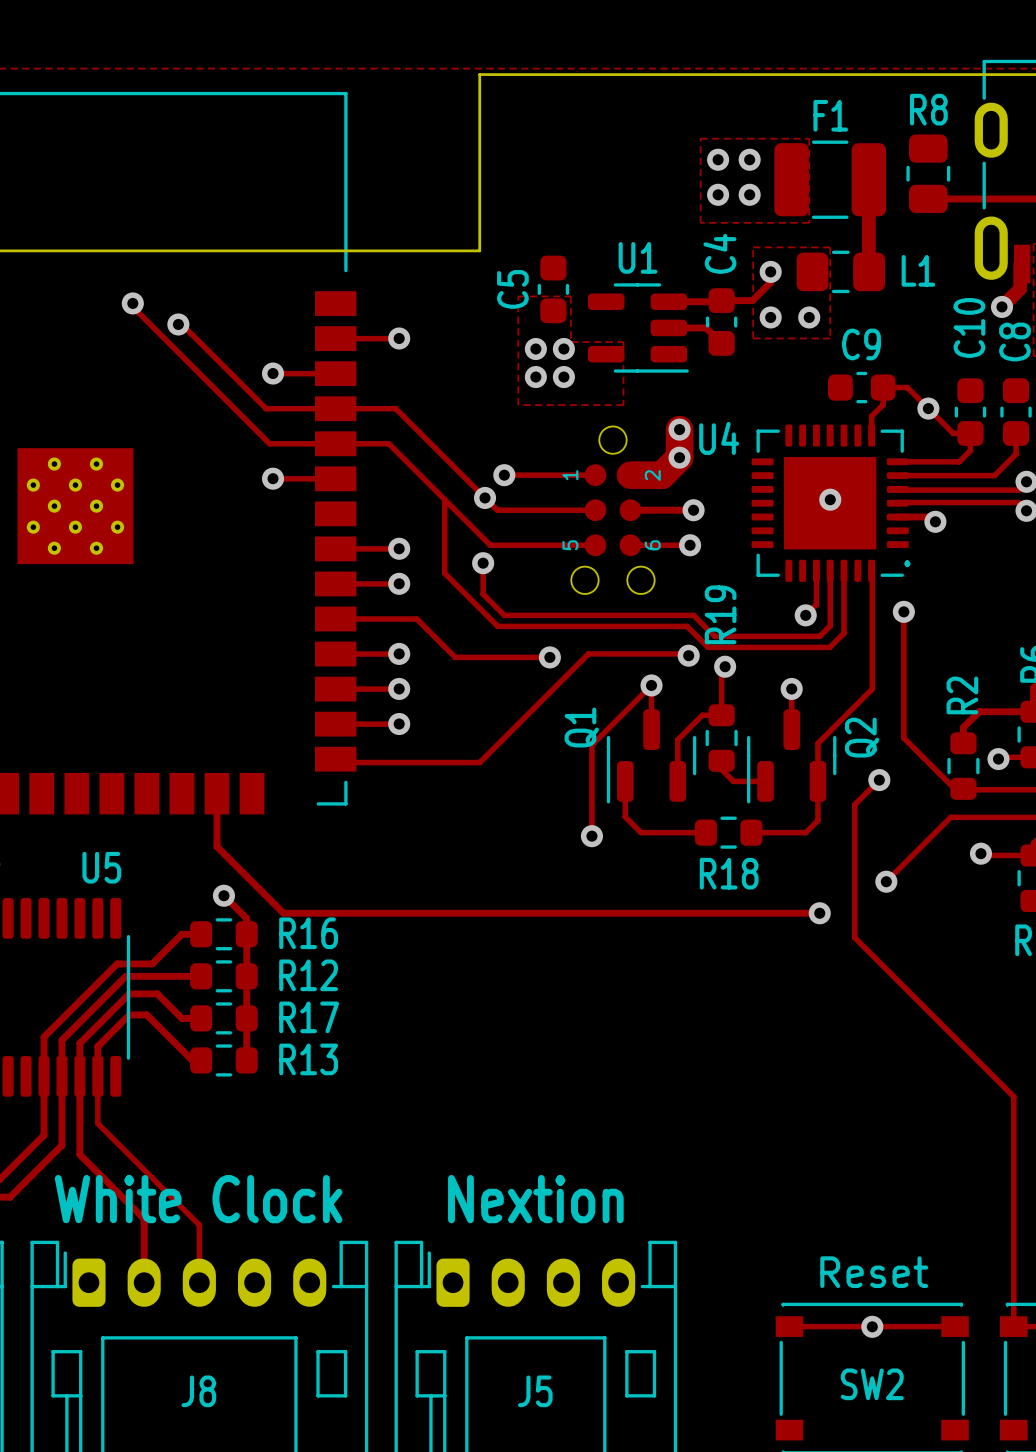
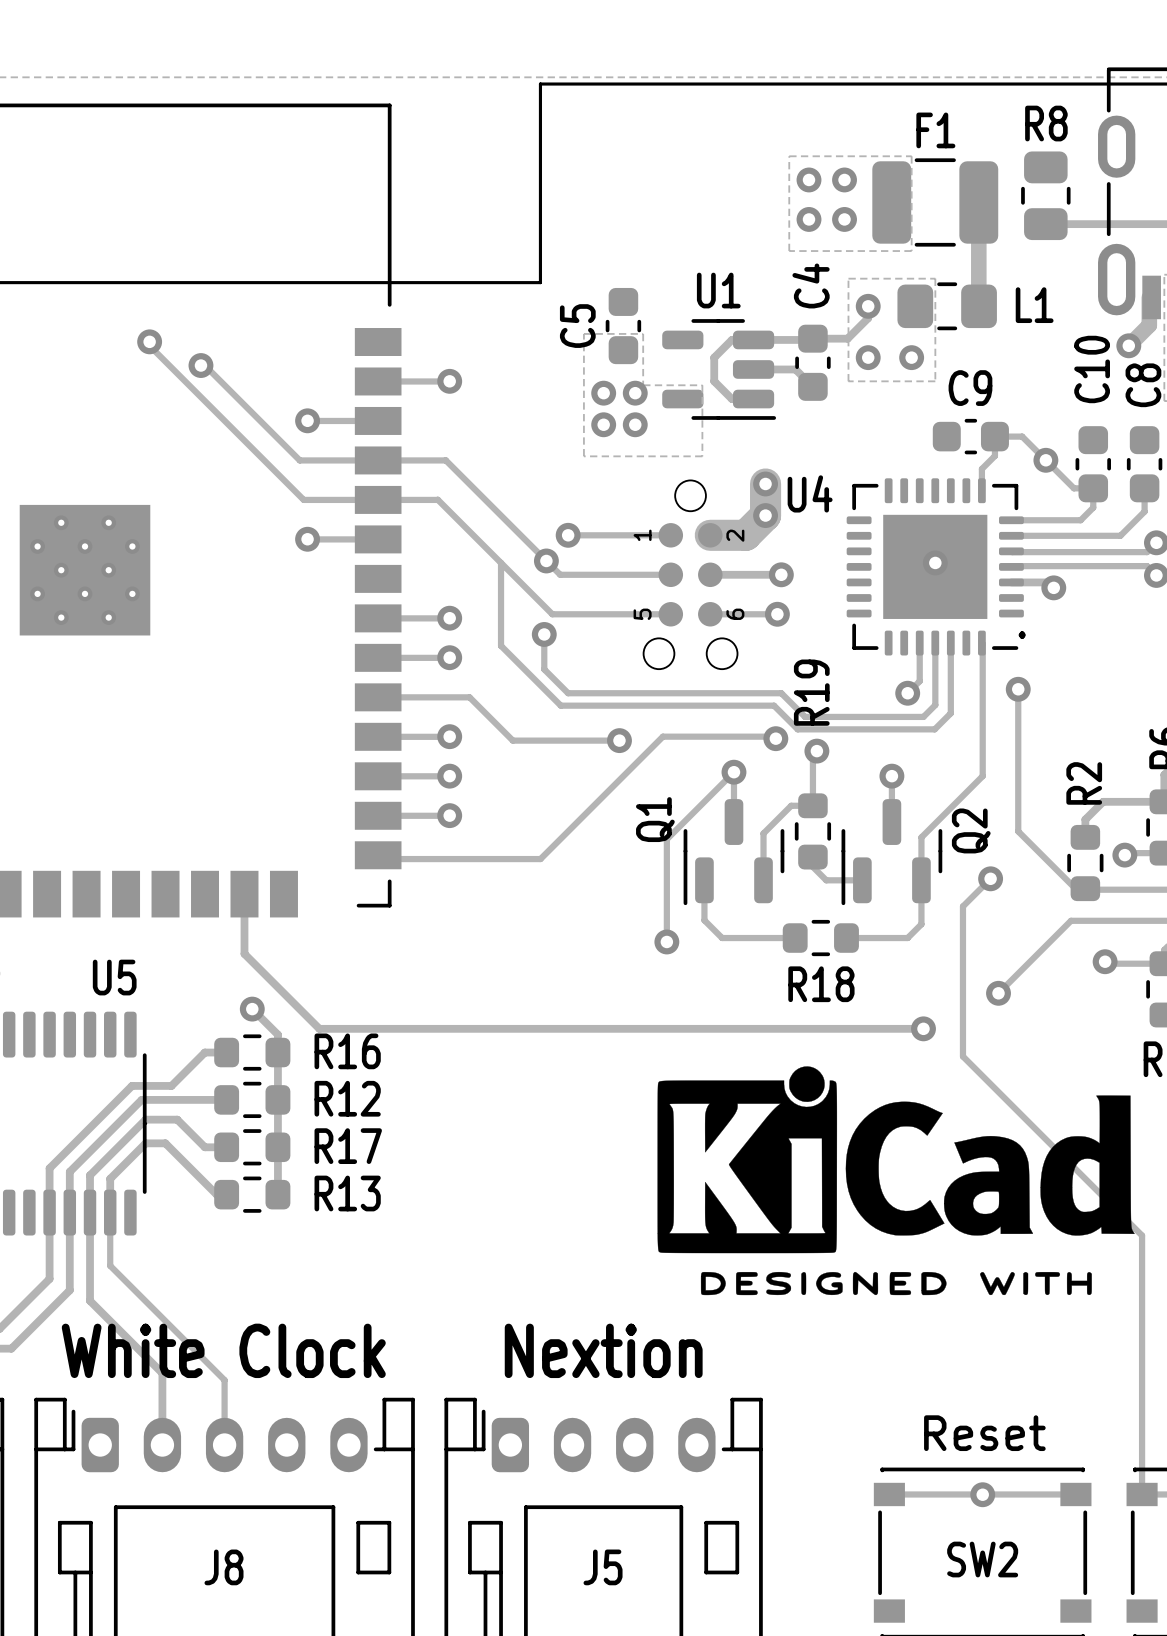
track: none -> (753, 339) (731, 339) (714, 357) (714, 381) (731, 399) (753, 399)
drawing: none -> [657, 1066, 1135, 1296]

